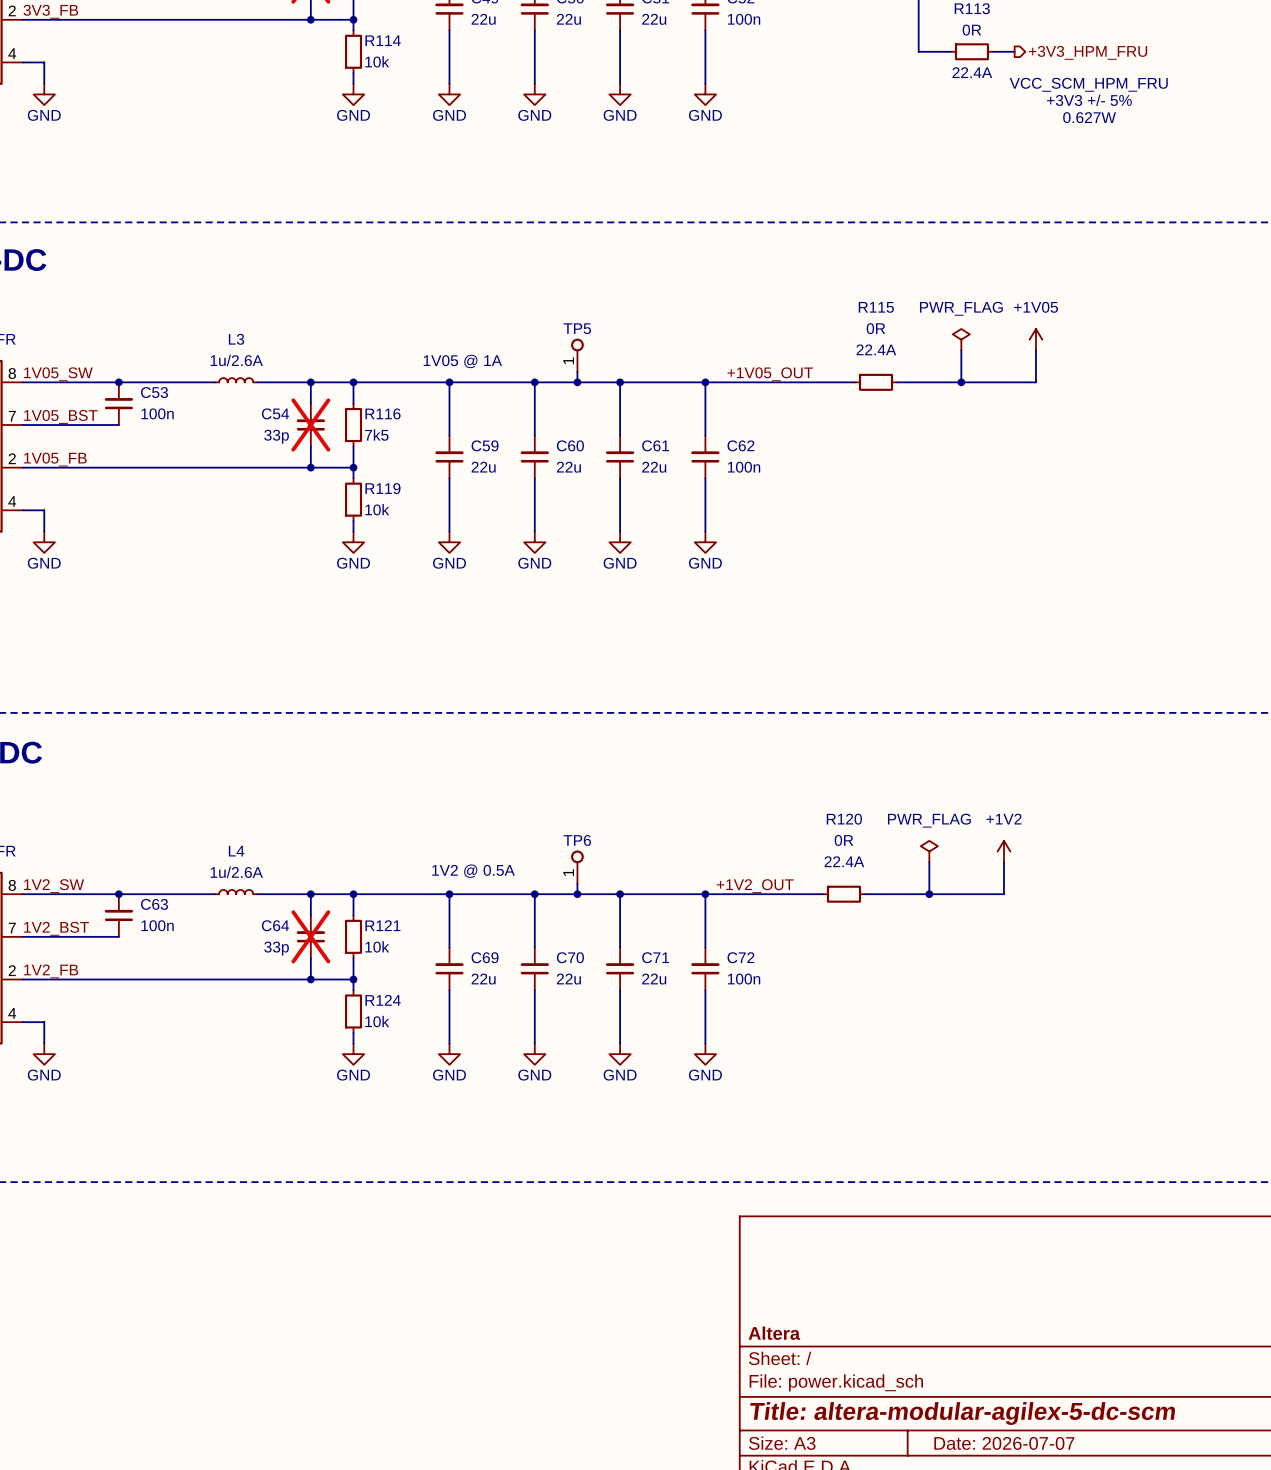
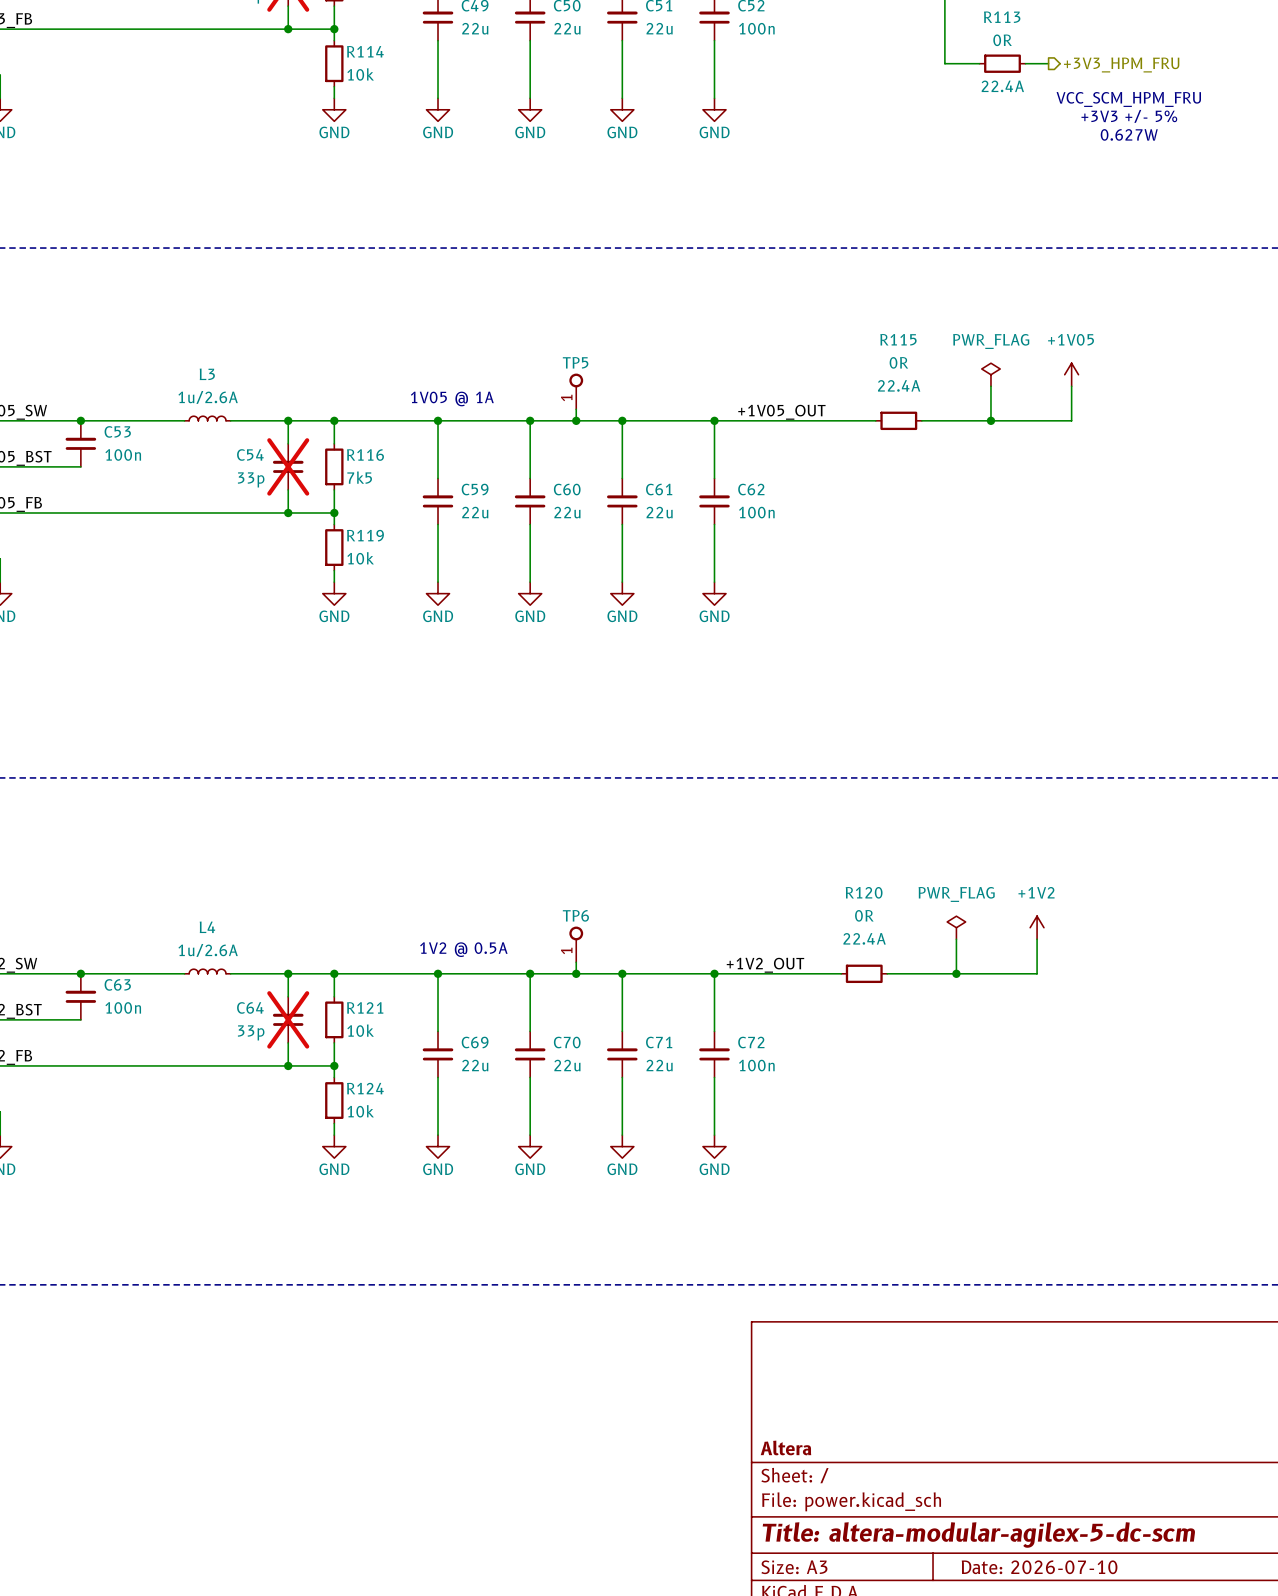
title block: Date: 2026-07-07 (1004, 1443) -> Date: 2026-07-10 (1039, 1567)

